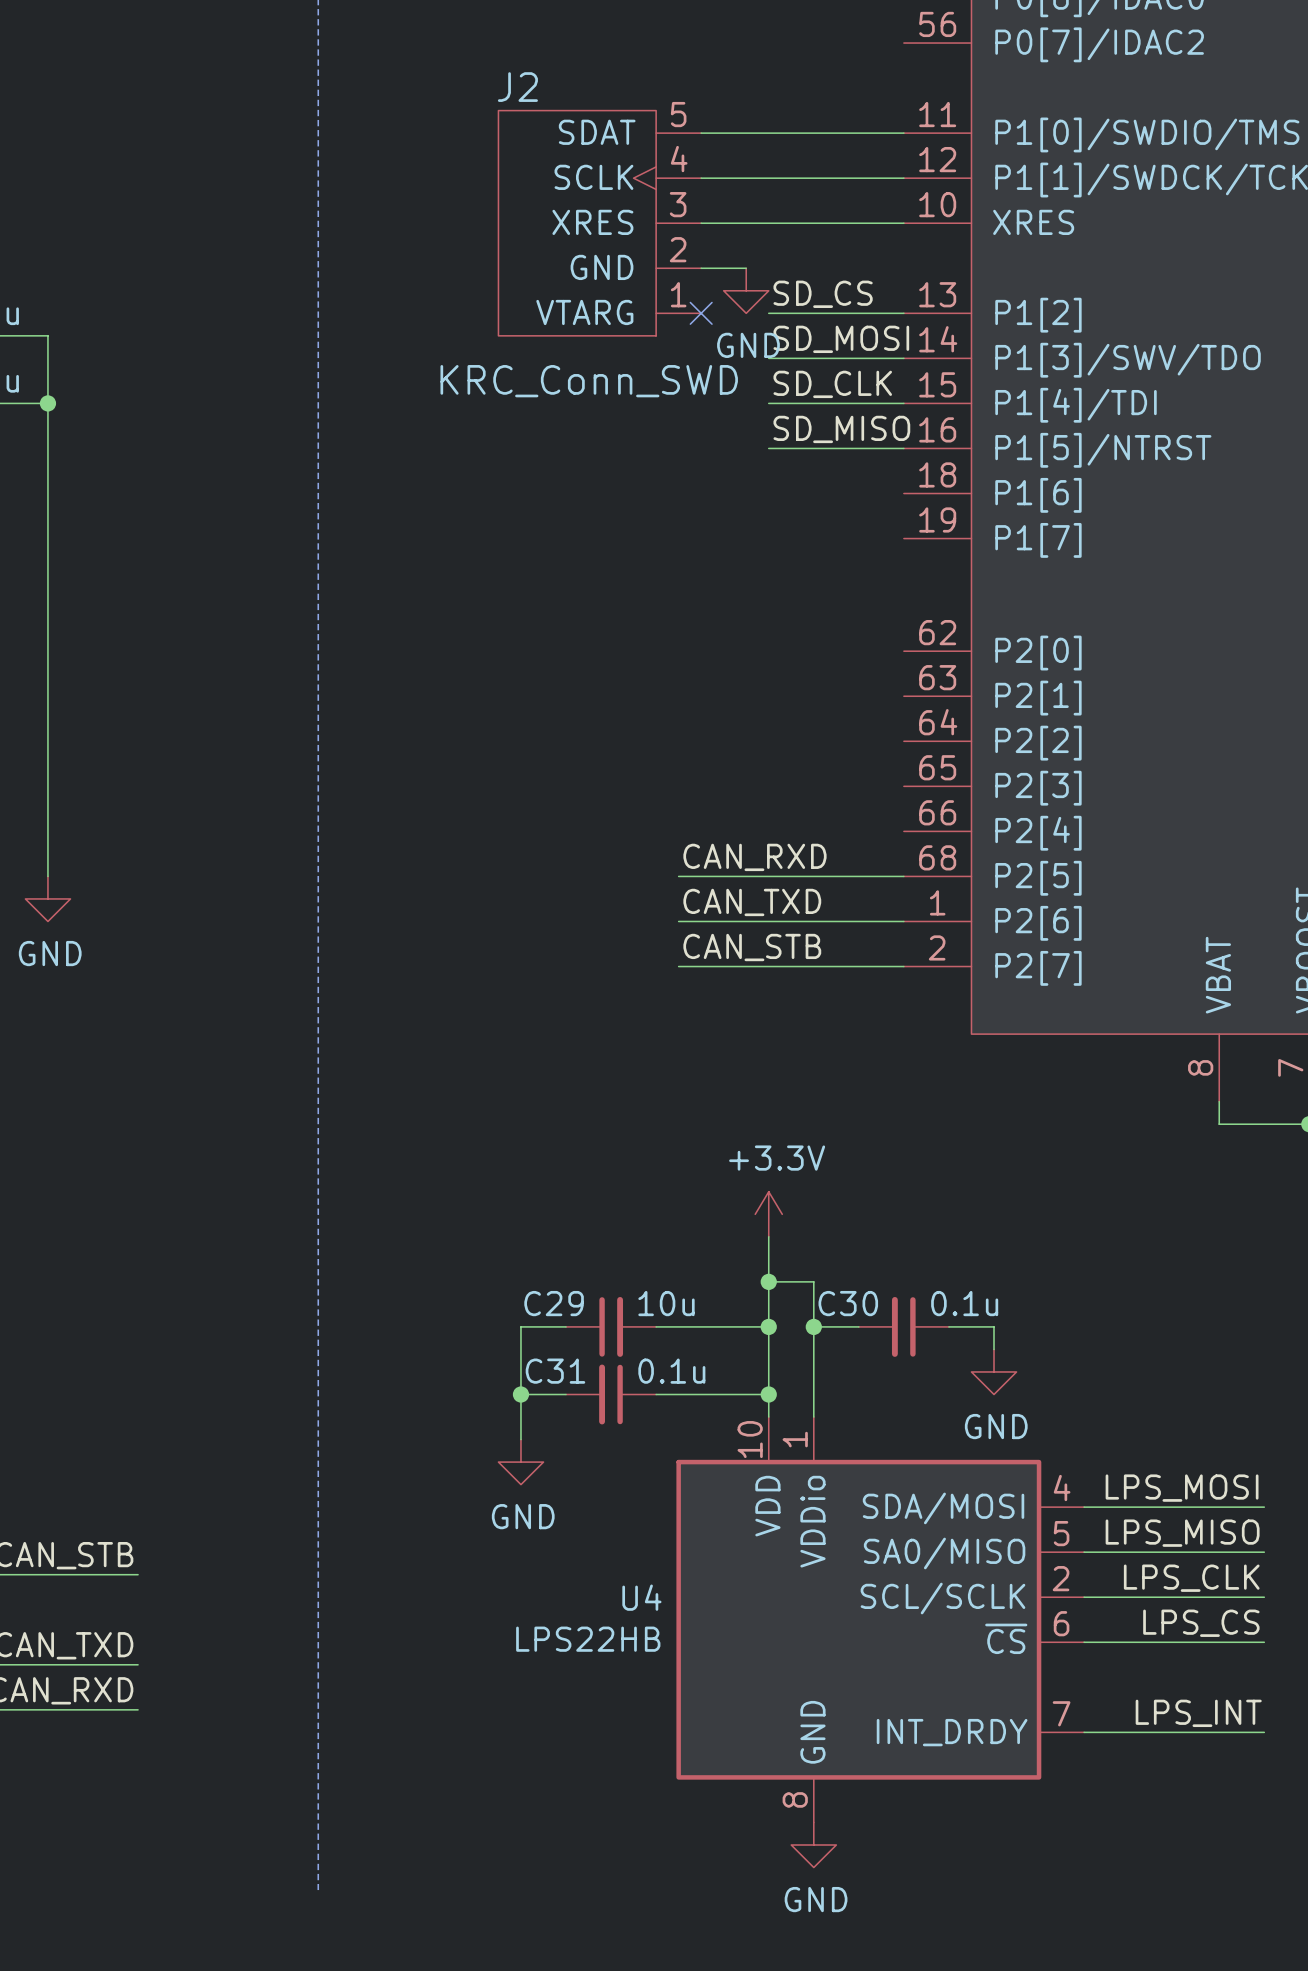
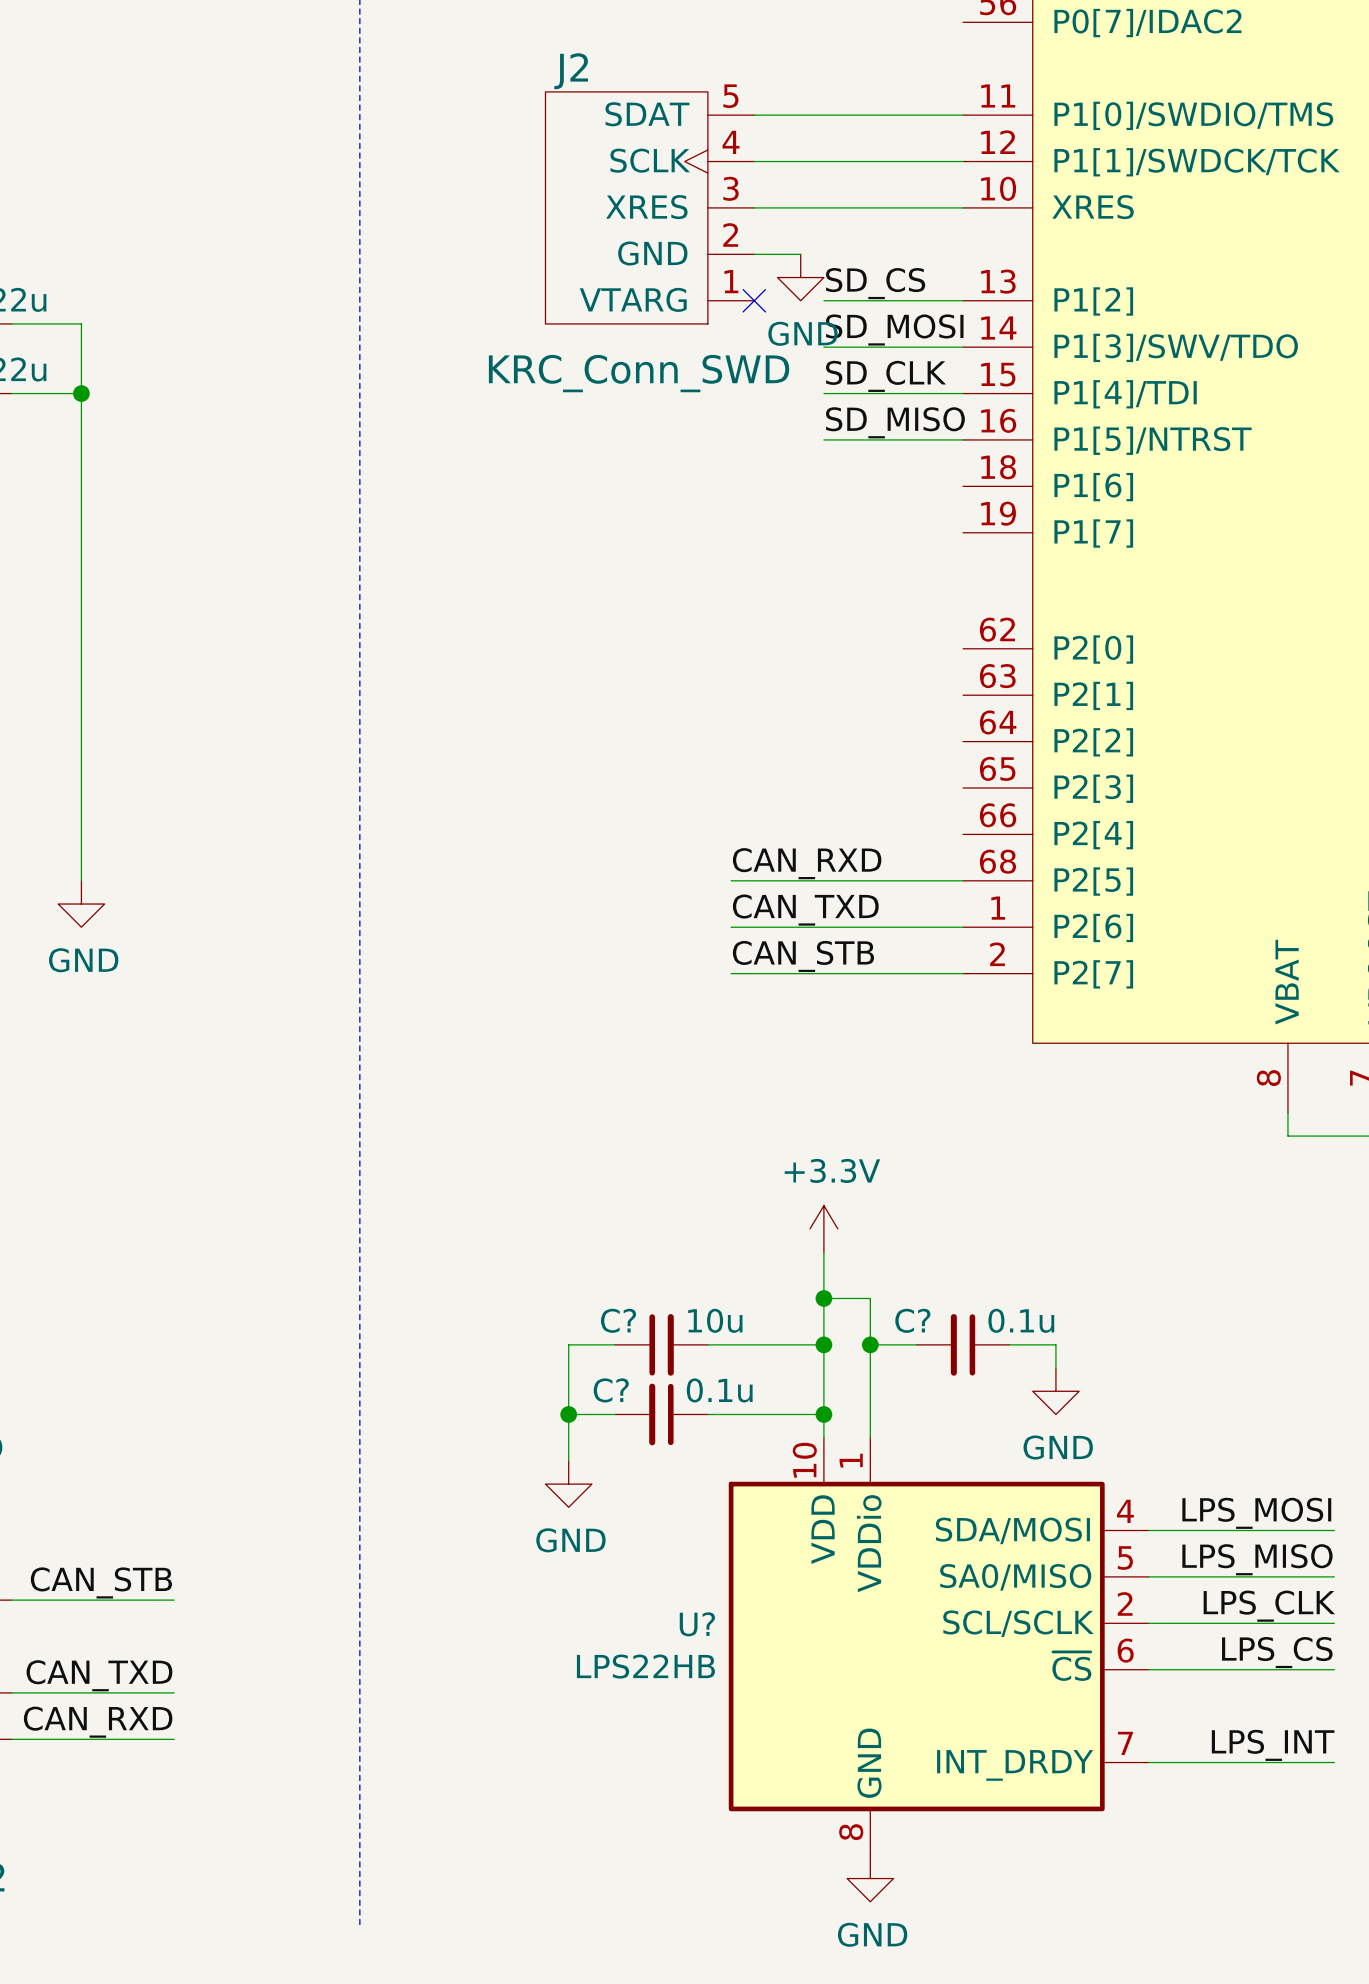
C29 name: C29 (554, 1303) -> C? (618, 1320)
C30 name: C30 (848, 1303) -> C? (912, 1320)
C31 name: C31 (555, 1371) -> C? (611, 1390)
U4 name: U4 (641, 1597) -> U? (697, 1624)

